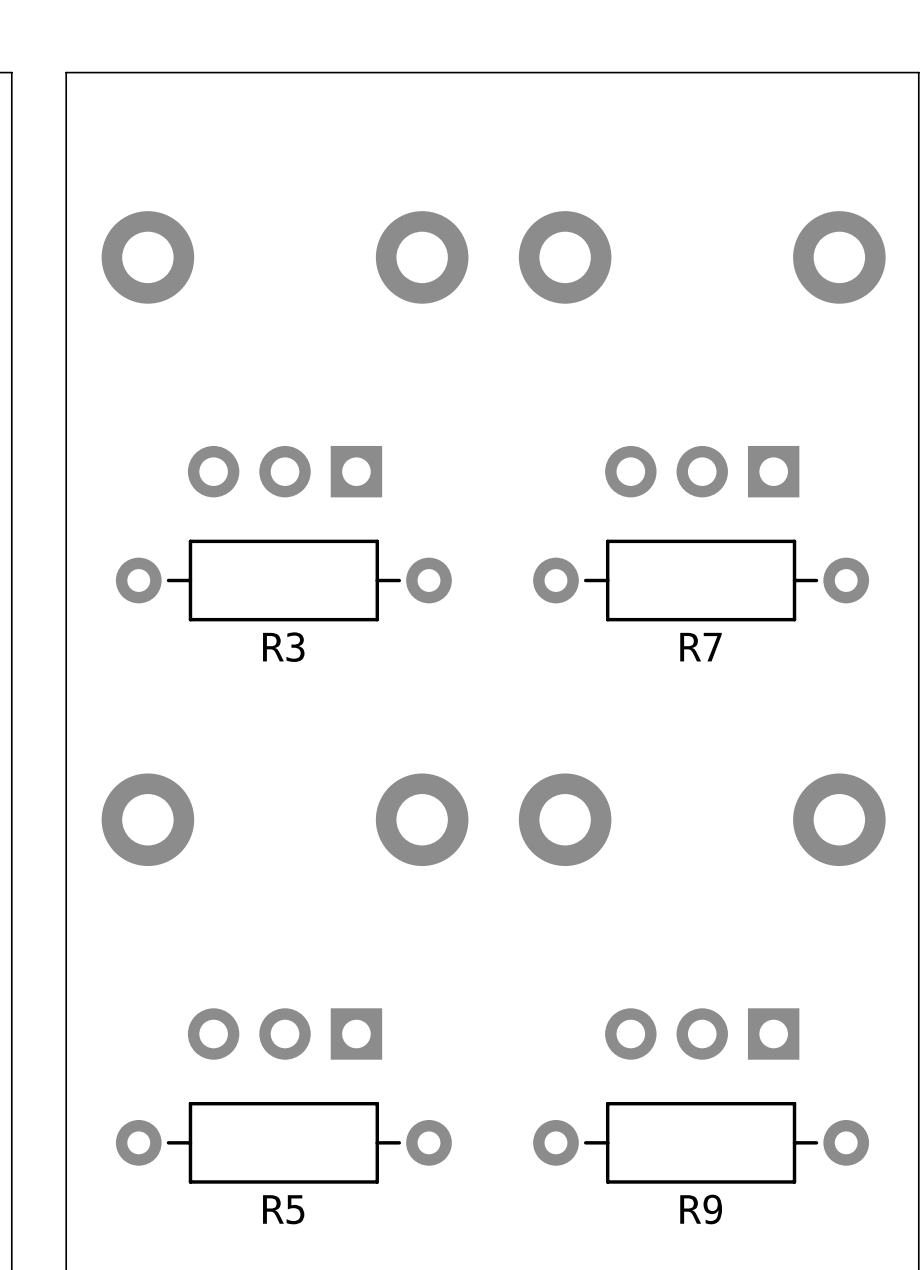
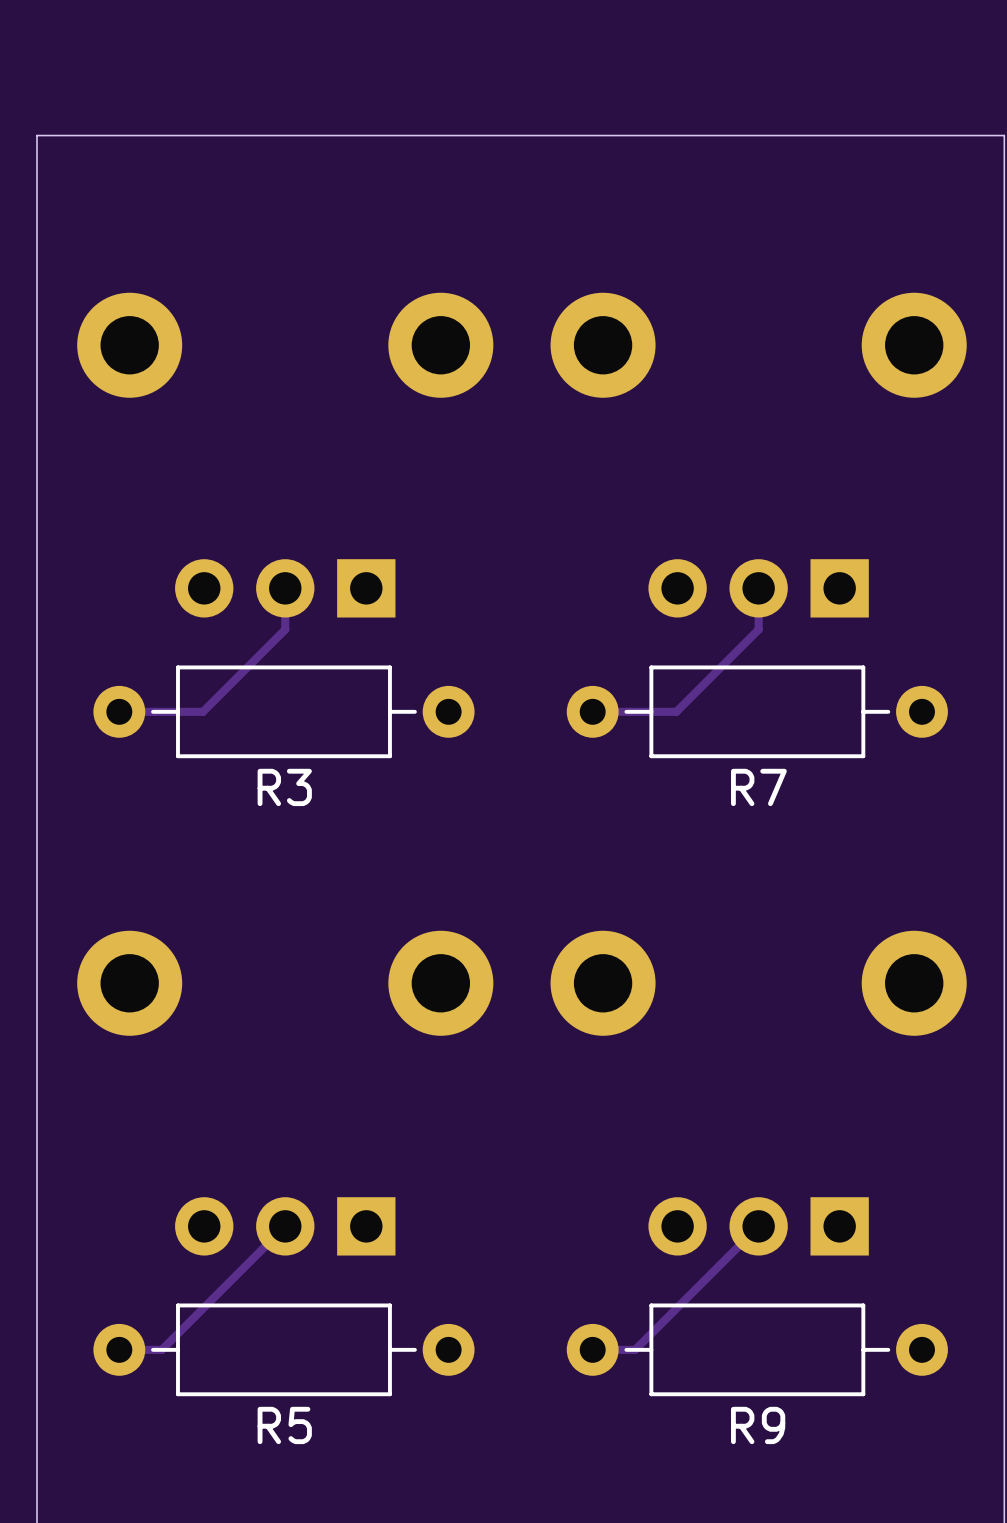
track: none -> (285, 588) (285, 629) (203, 711) (119, 711)
track: none -> (758, 588) (758, 629) (676, 711) (592, 711)
track: none -> (285, 1226) (161, 1349) (119, 1349)
track: none -> (758, 1226) (635, 1349) (592, 1349)

